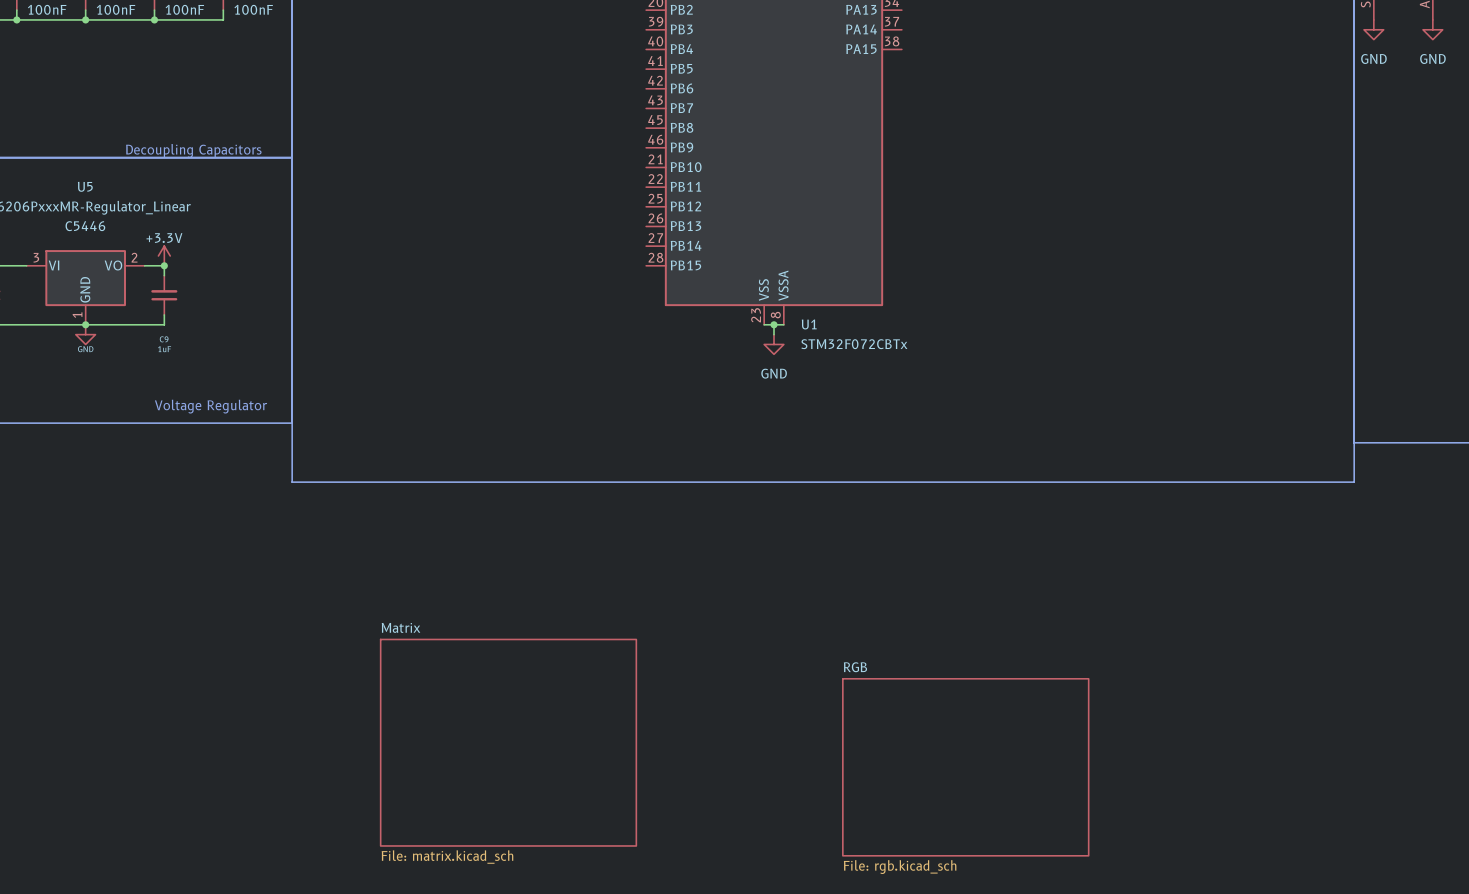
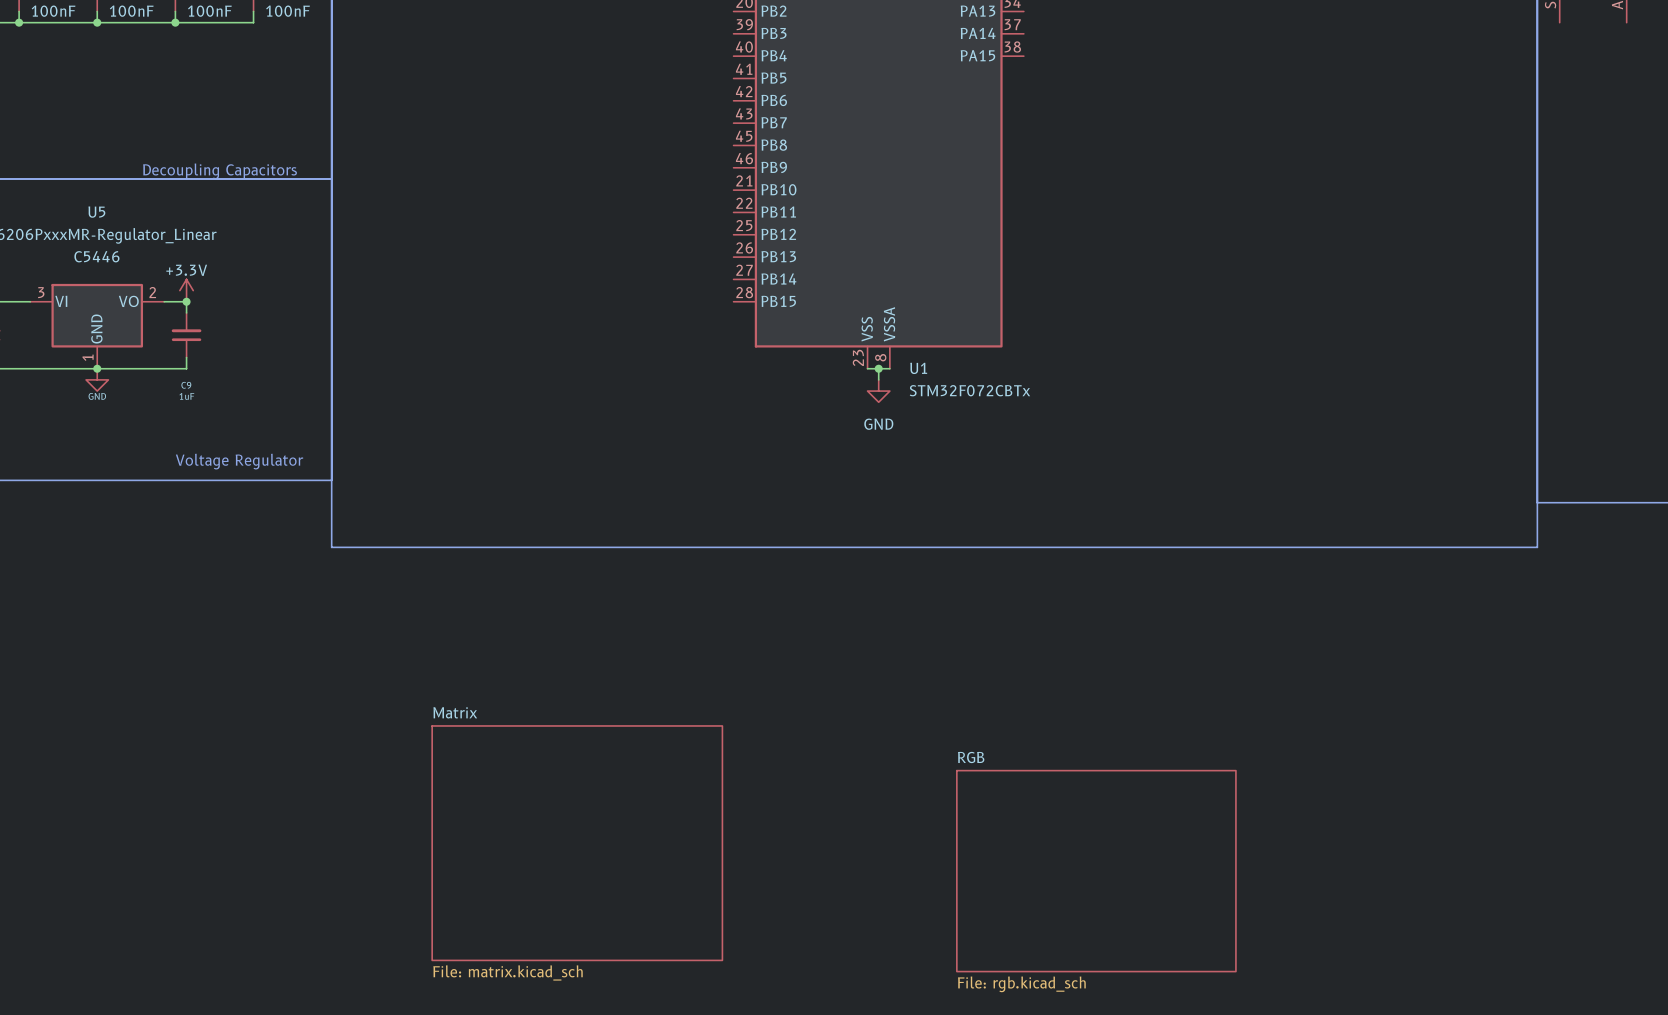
power symbol: GND (1373, 29) -> none
power symbol: GND (1432, 29) -> none

